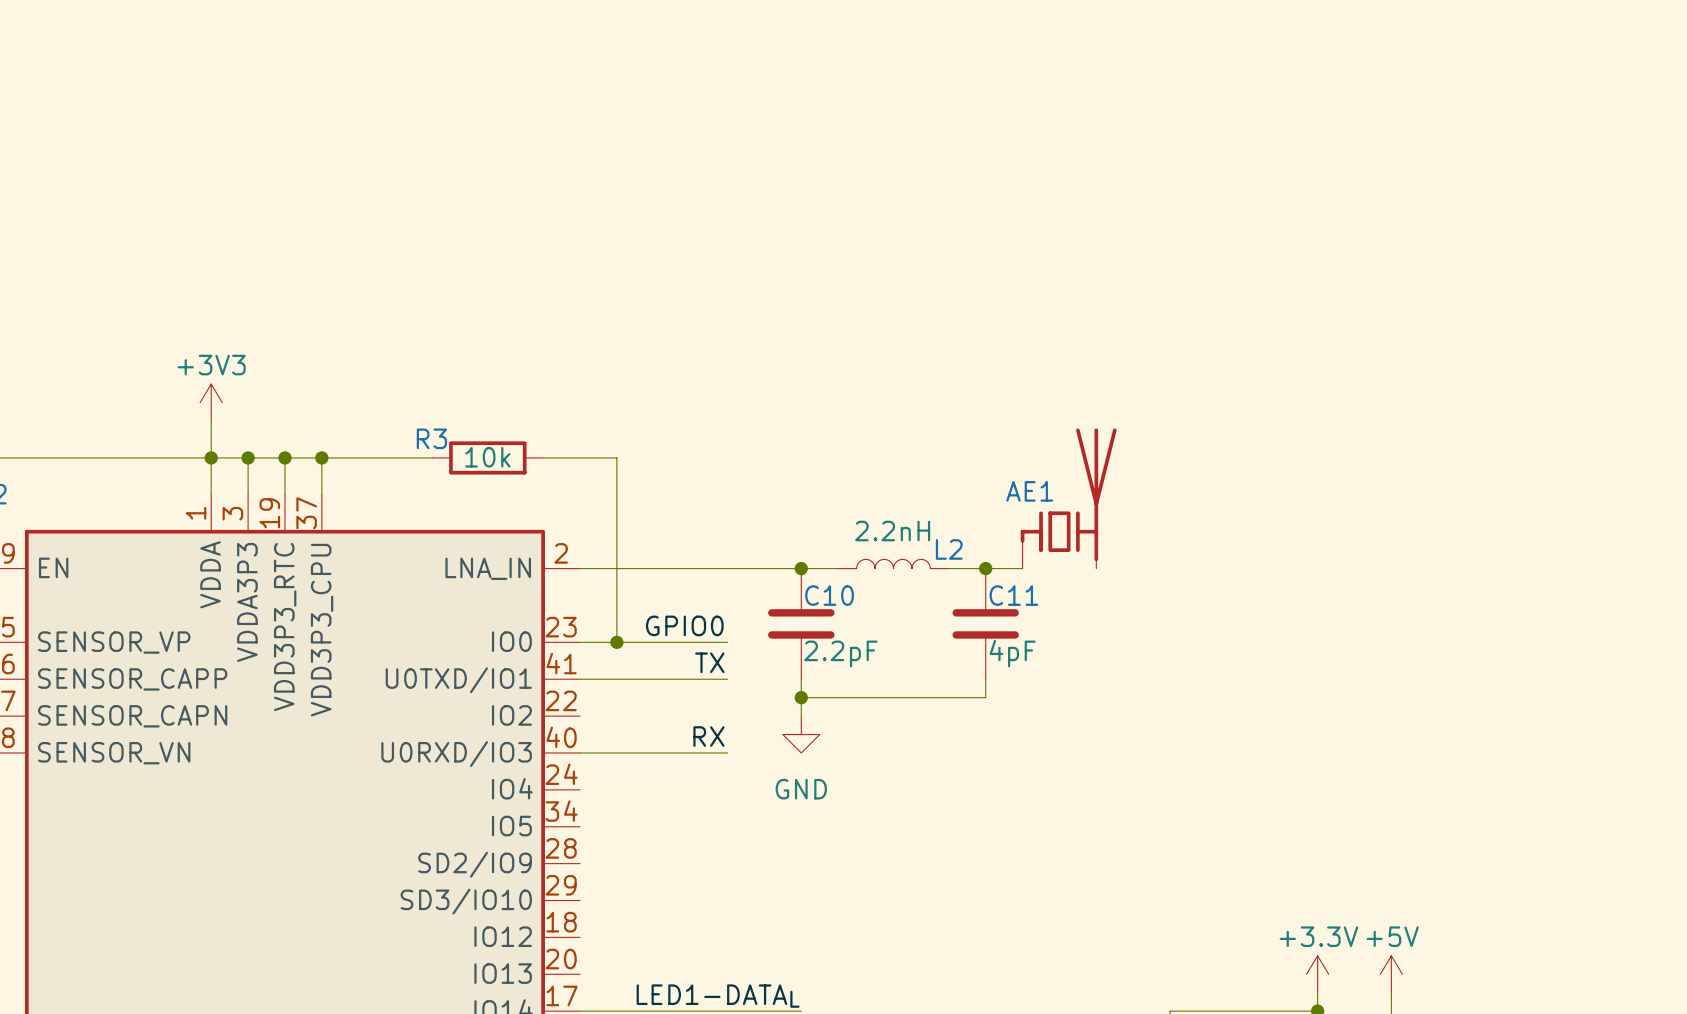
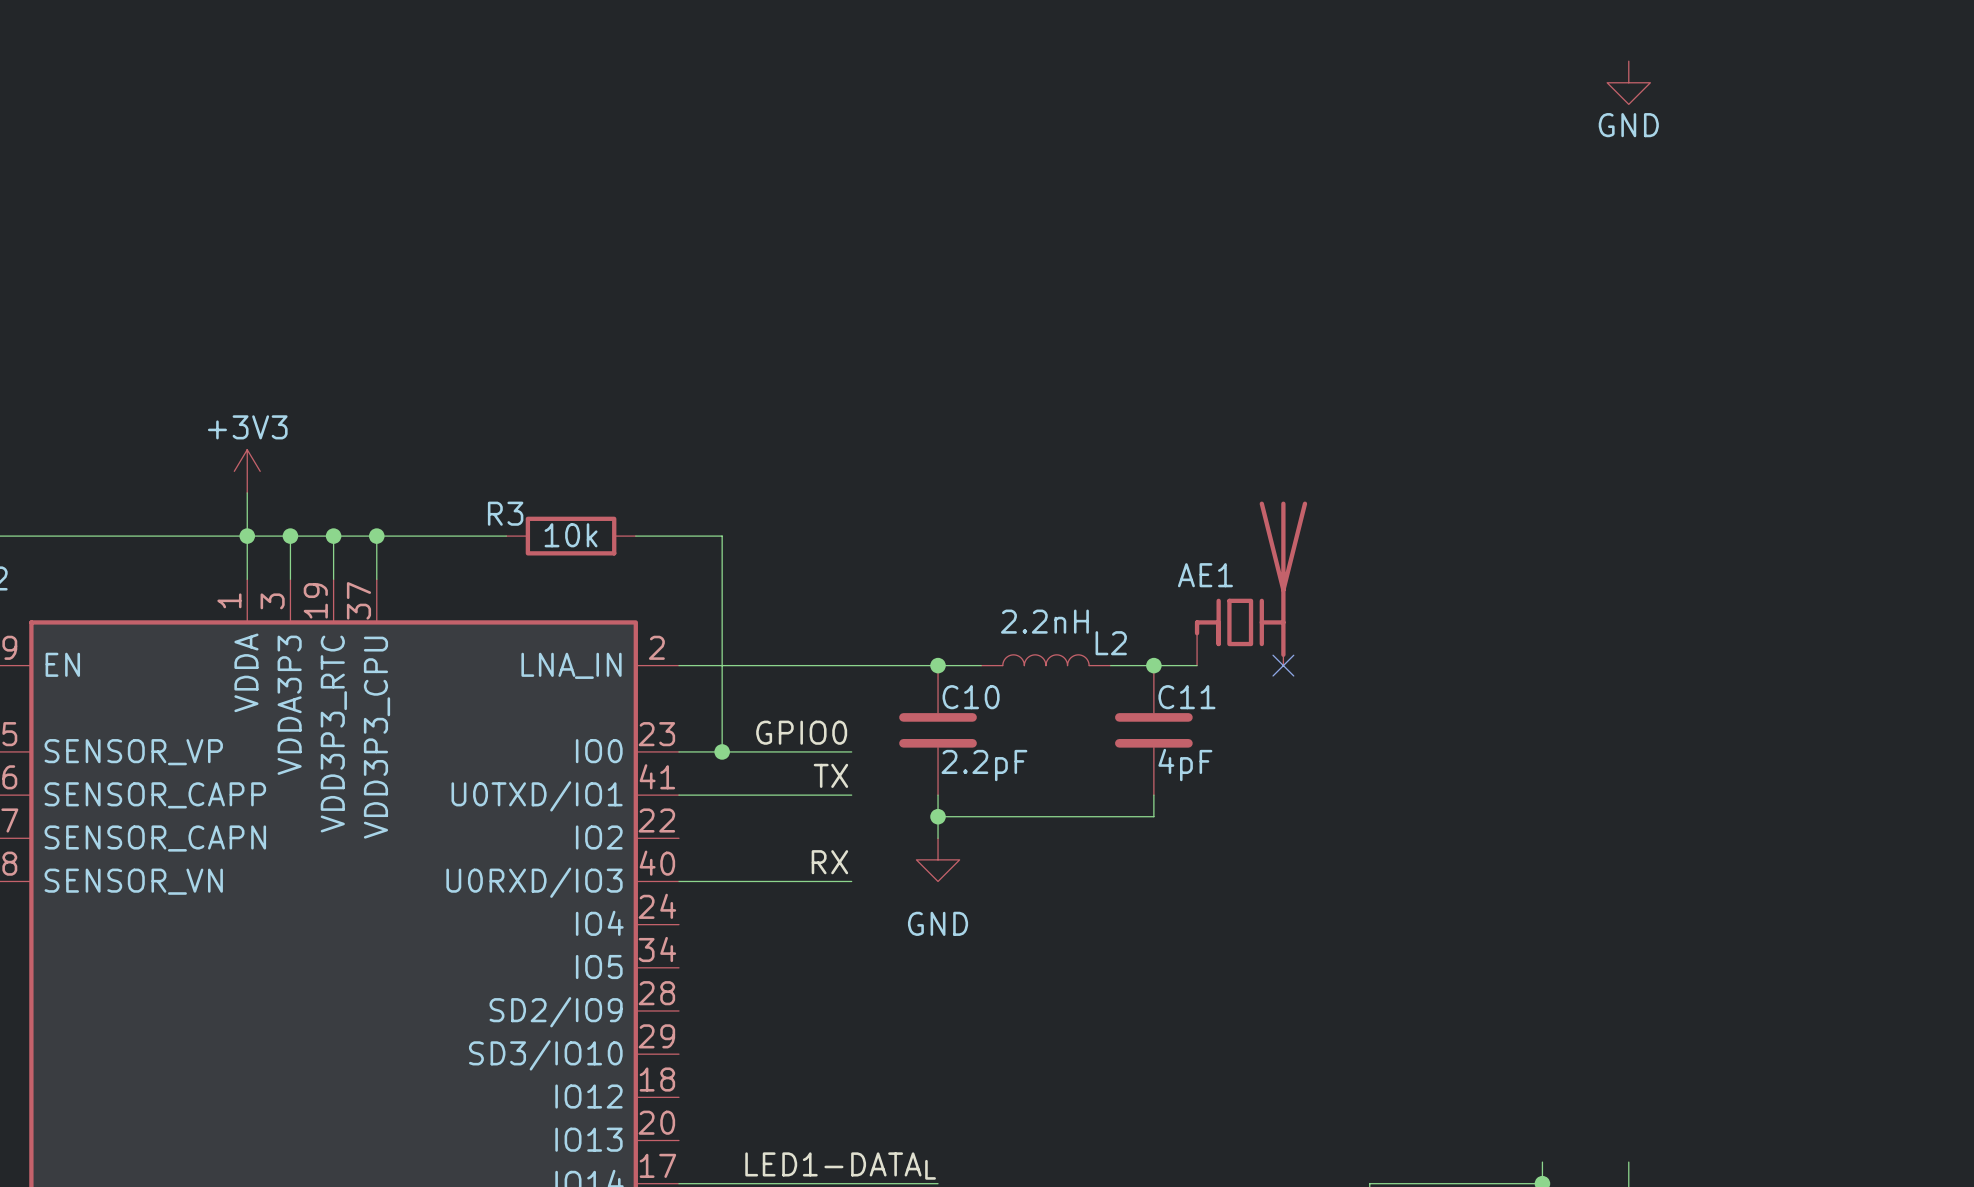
power symbol: none -> GND (1628, 82)
no-connect mark: none -> (1283, 665)
power symbol: +3.3V (1317, 974) -> none
power symbol: +5V (1391, 974) -> none

